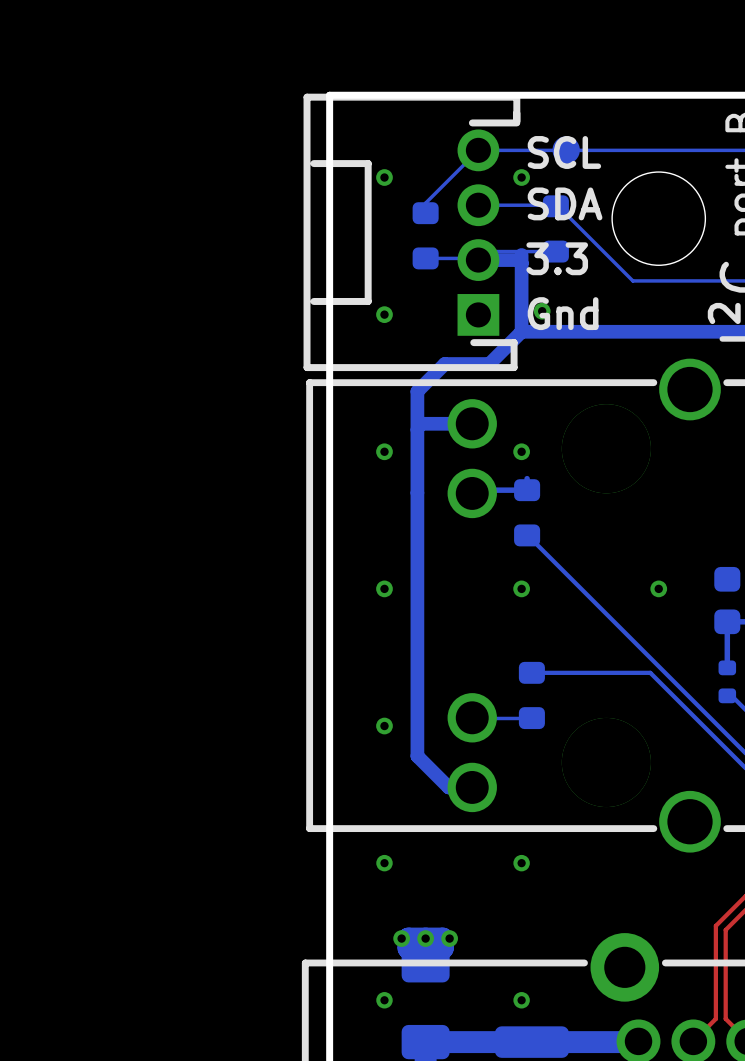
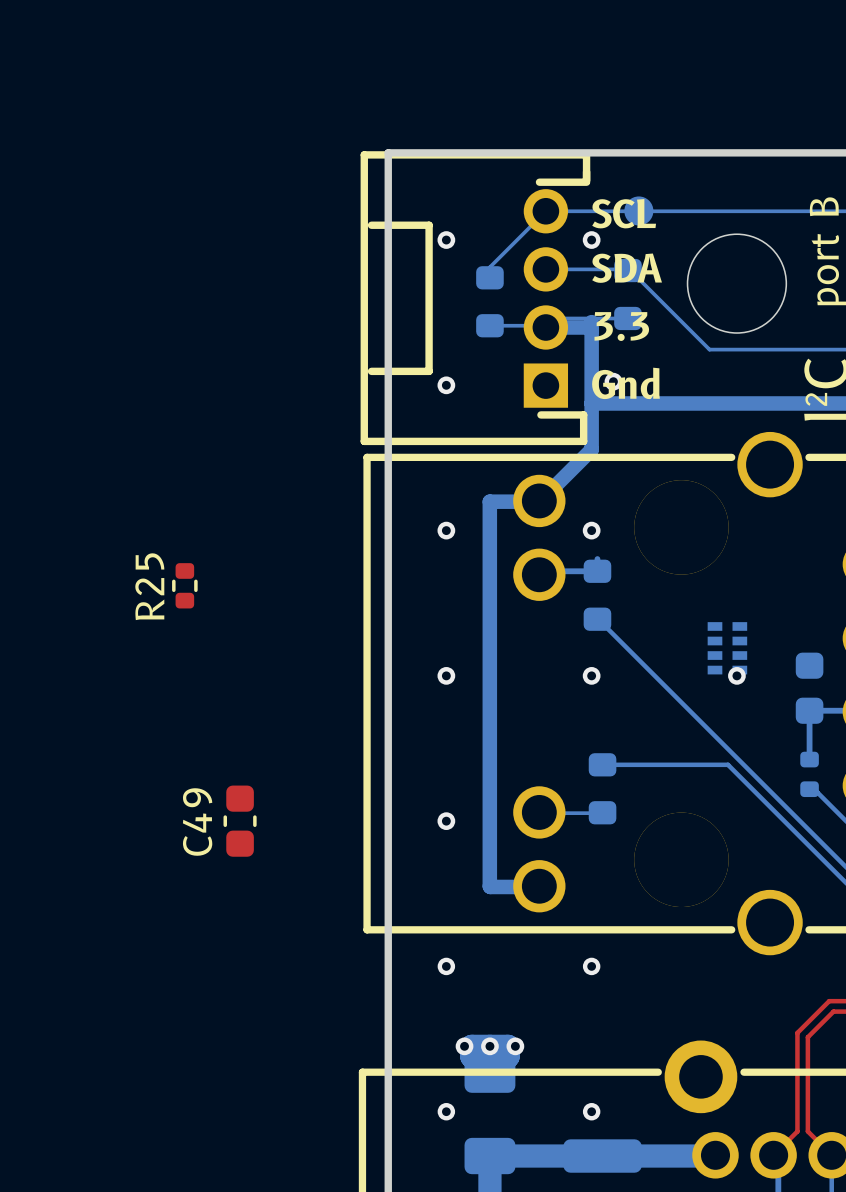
bottom track: (521, 331) (489, 364) (444, 364) (417, 391) (417, 756) (448, 787) (472, 787) -> (591, 403) (591, 449) (539, 501) (489, 501) (489, 886) (539, 886)
bottom track: (472, 423) (423, 423) (417, 429) -> none
R25: none -> (184, 585)
part: none -> (727, 648)
C49: none -> (240, 821)

